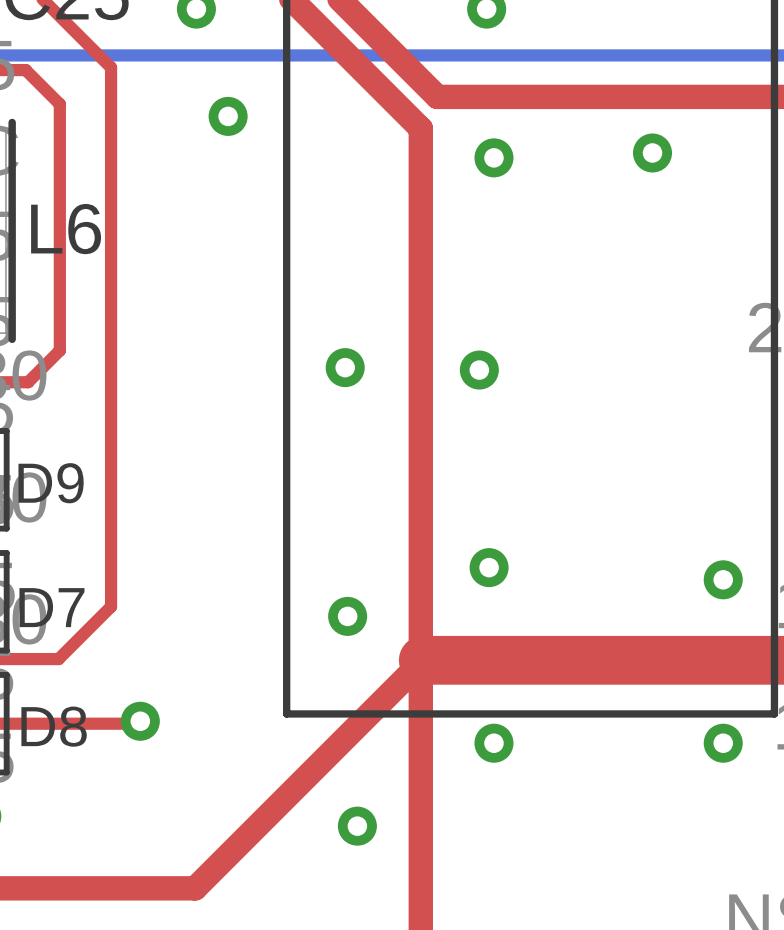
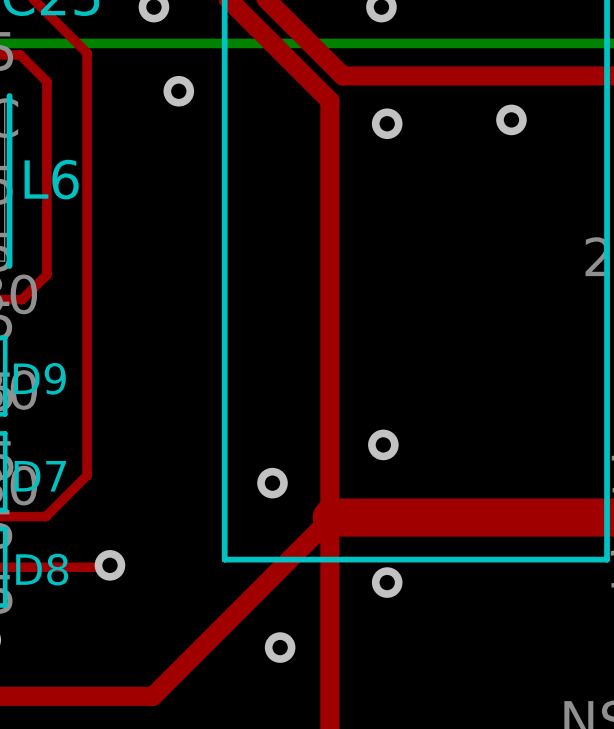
via: (345, 367) -> none
via: (479, 370) -> none
via: (723, 579) -> none
via: (723, 743) -> none

